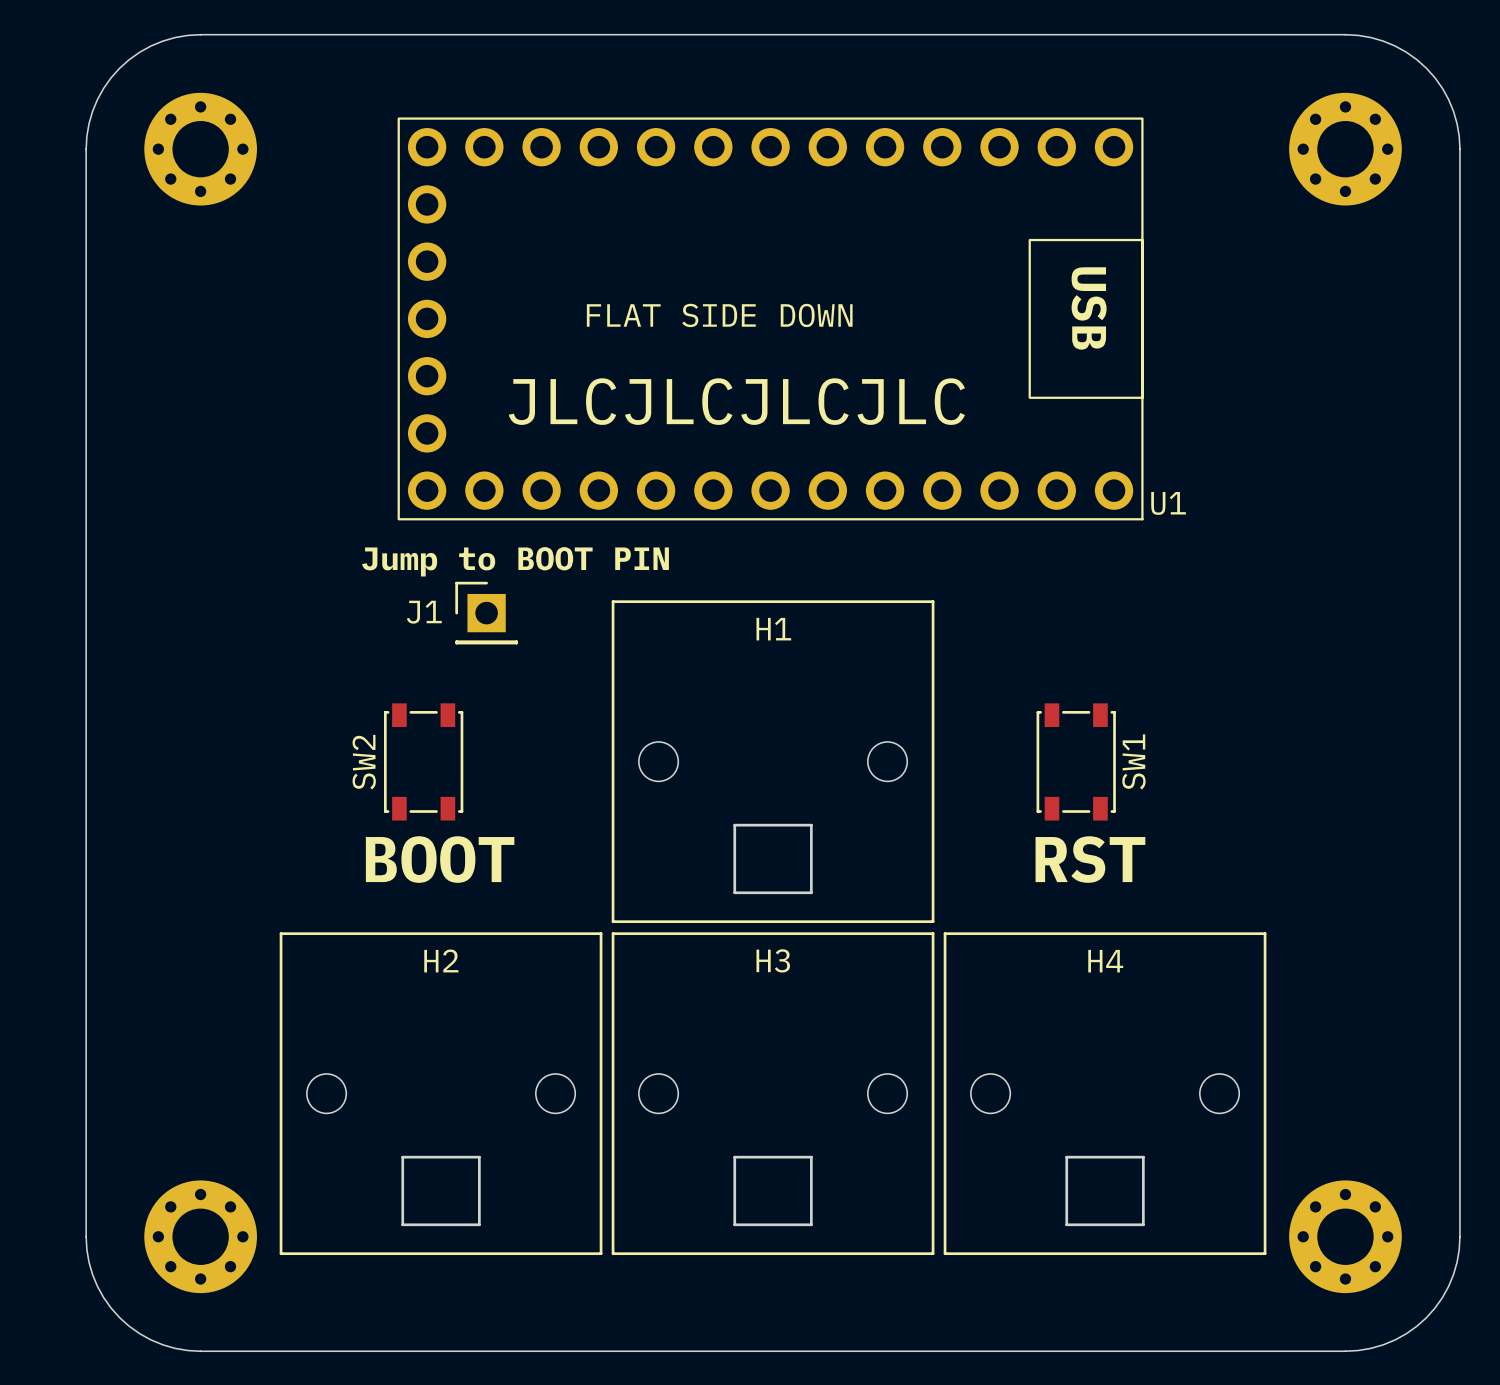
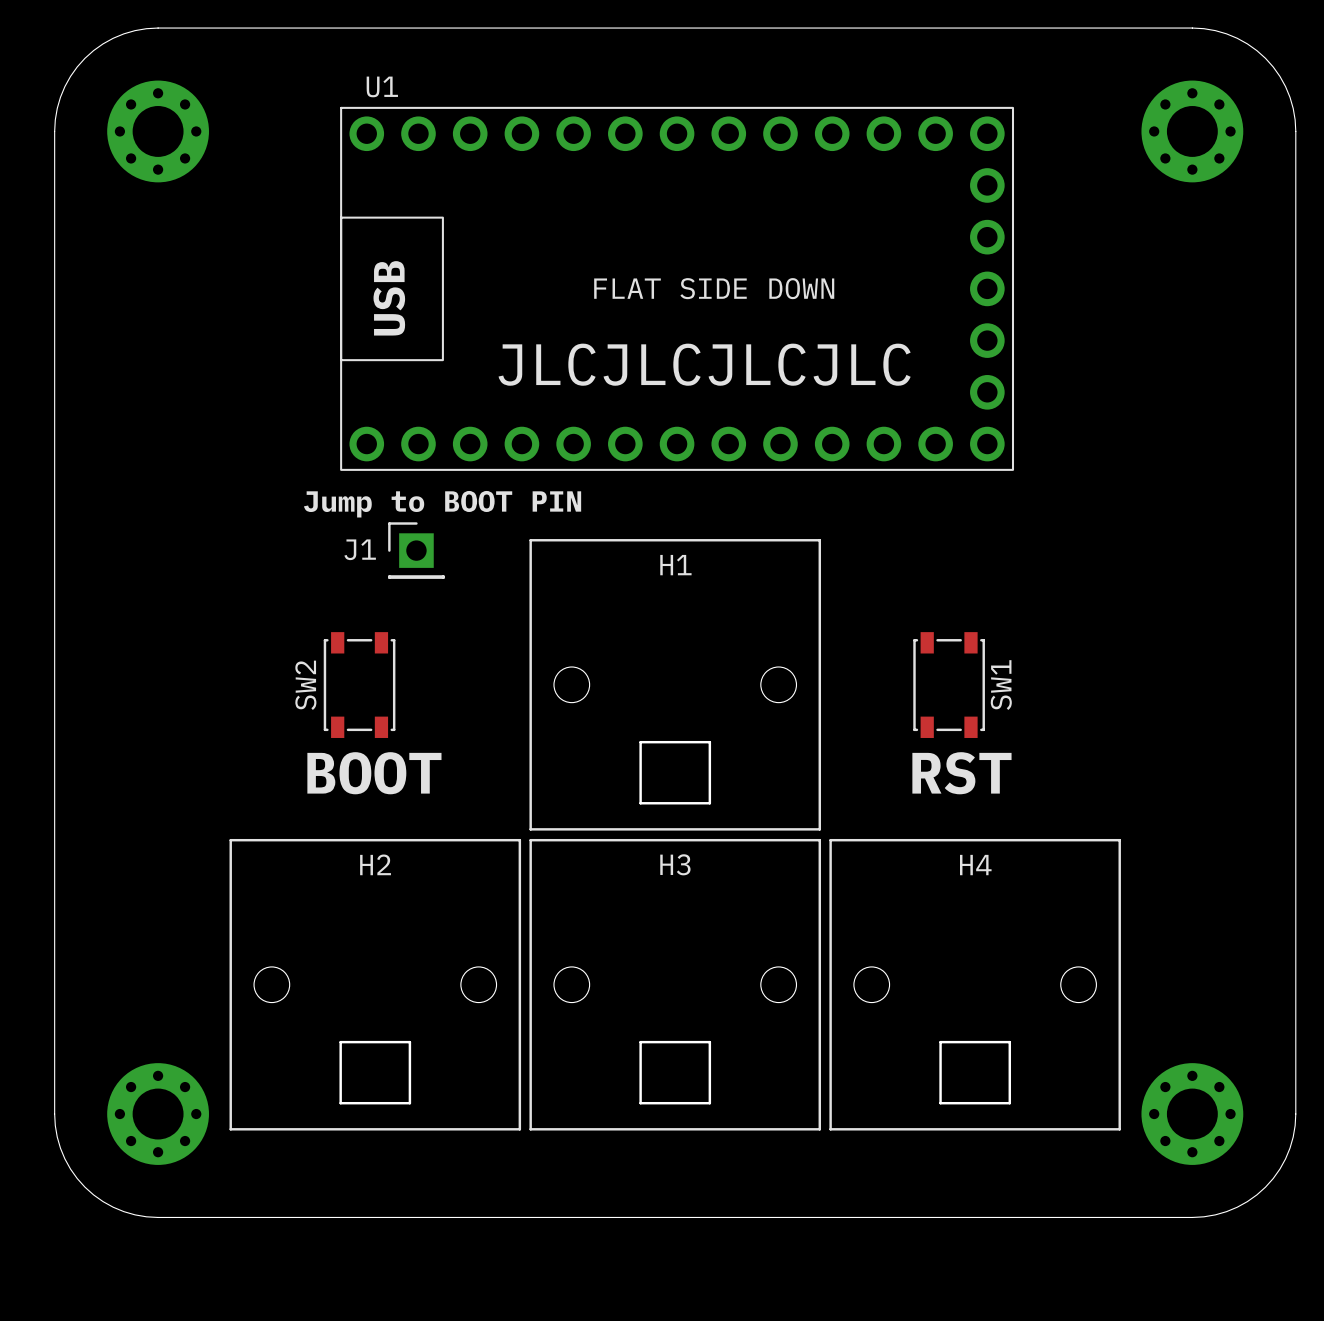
U1 footprint: [397, 117, 1144, 521] -> [340, 106, 1015, 471]
text position: JLCJLCJLCJLC (736, 401) -> JLCJLCJLCJLC (704, 364)
U1 name position: U1 (1168, 503) -> U1 (382, 86)

